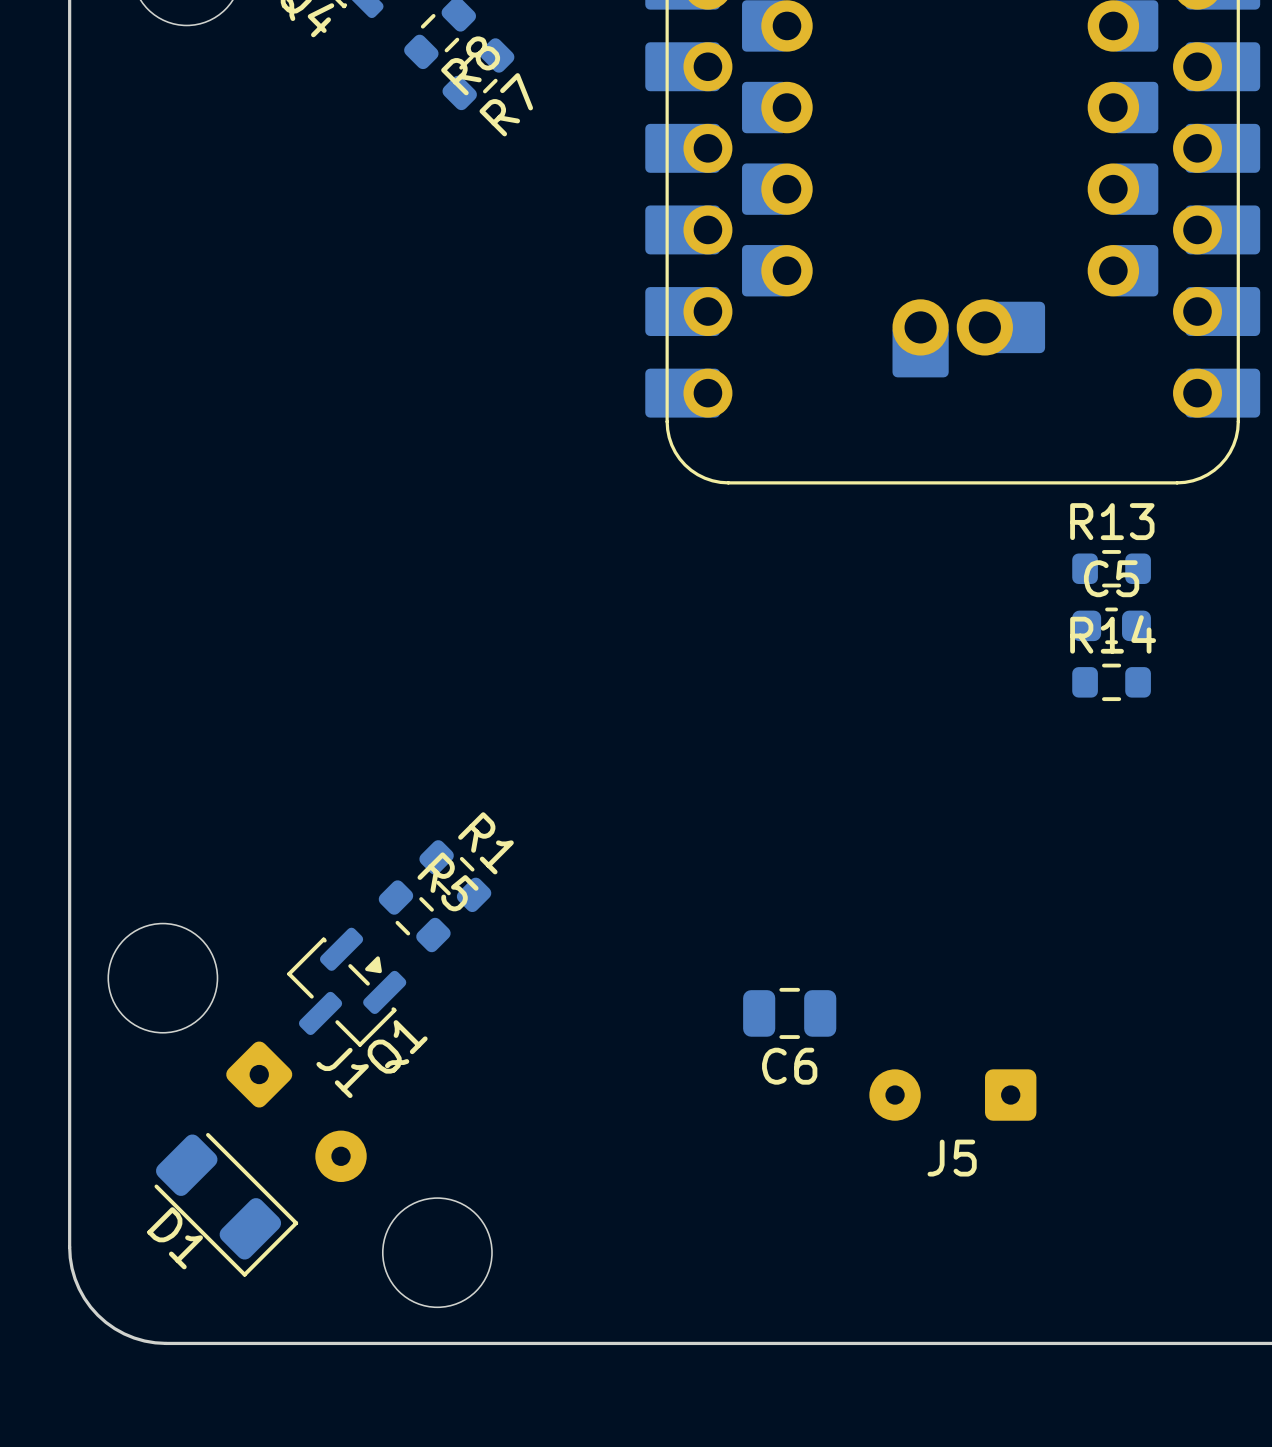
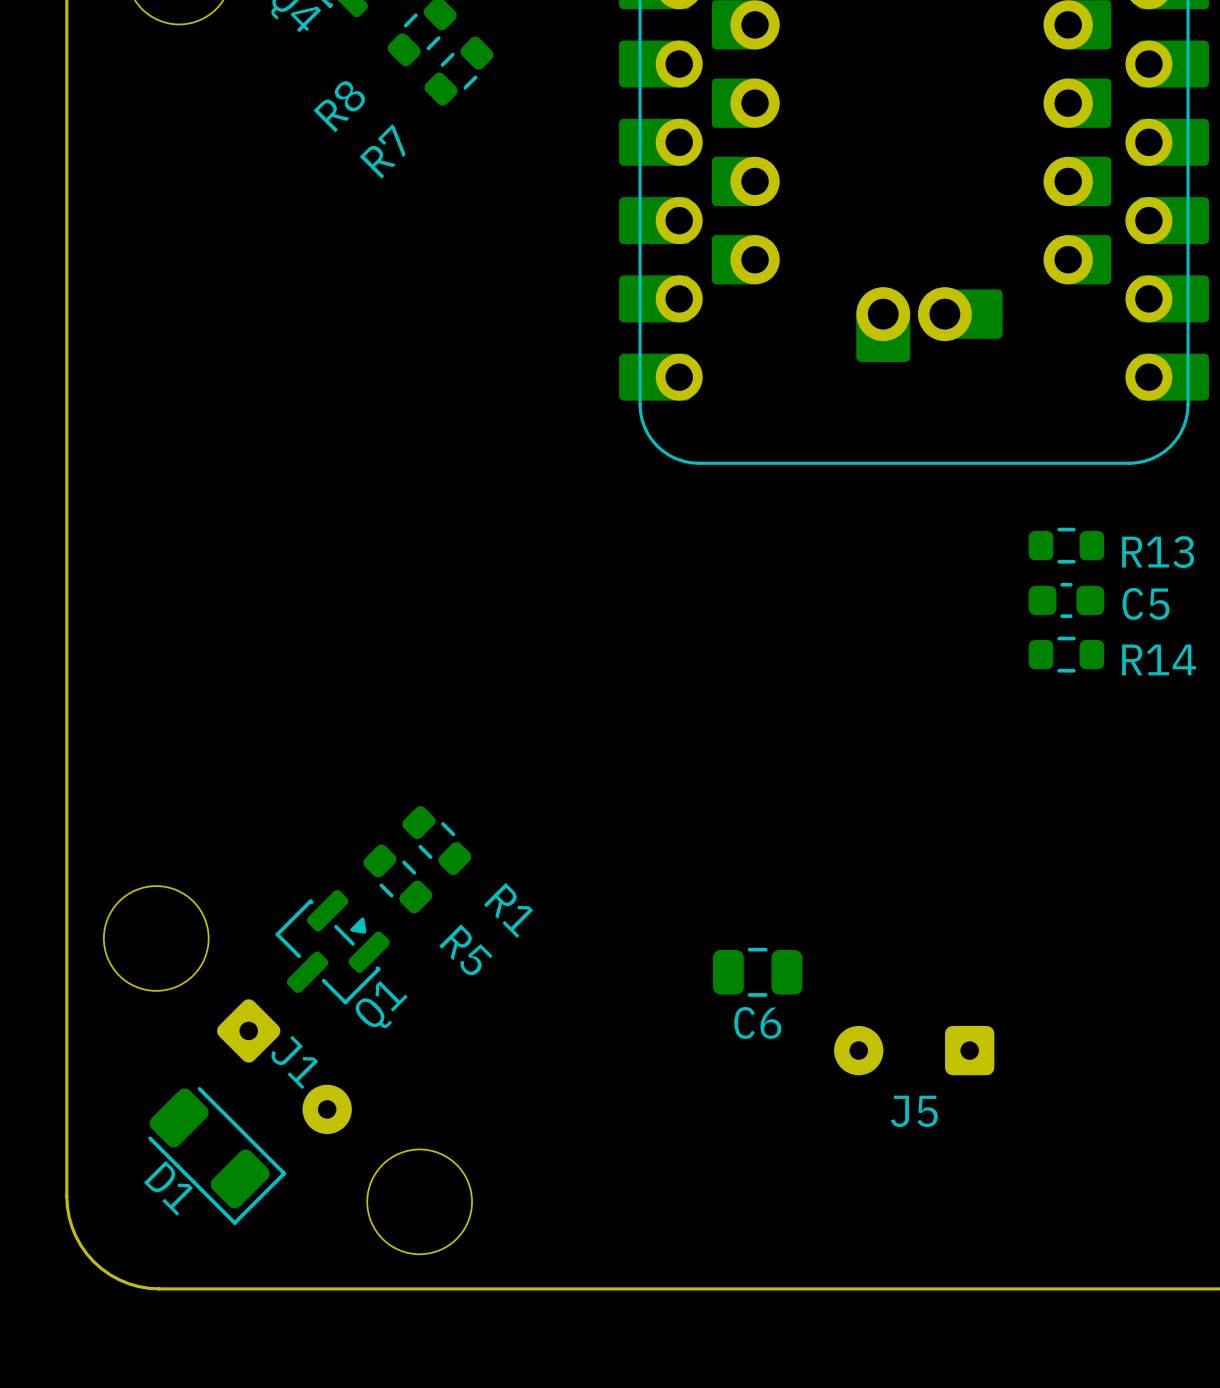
R8 name position: R8 (470, 65) -> R8 (339, 106)
R7 name position: R7 (506, 104) -> R7 (382, 151)
R13 name position: R13 (1112, 521) -> R13 (1158, 552)
C5 name position: C5 (1111, 578) -> C5 (1146, 603)
R14 name position: R14 (1113, 634) -> R14 (1159, 659)
R1 name position: R1 (485, 843) -> R1 (508, 910)
R5 name position: R5 (448, 881) -> R5 (465, 949)
J1 name position: J1 (342, 1072) -> J1 (294, 1062)

